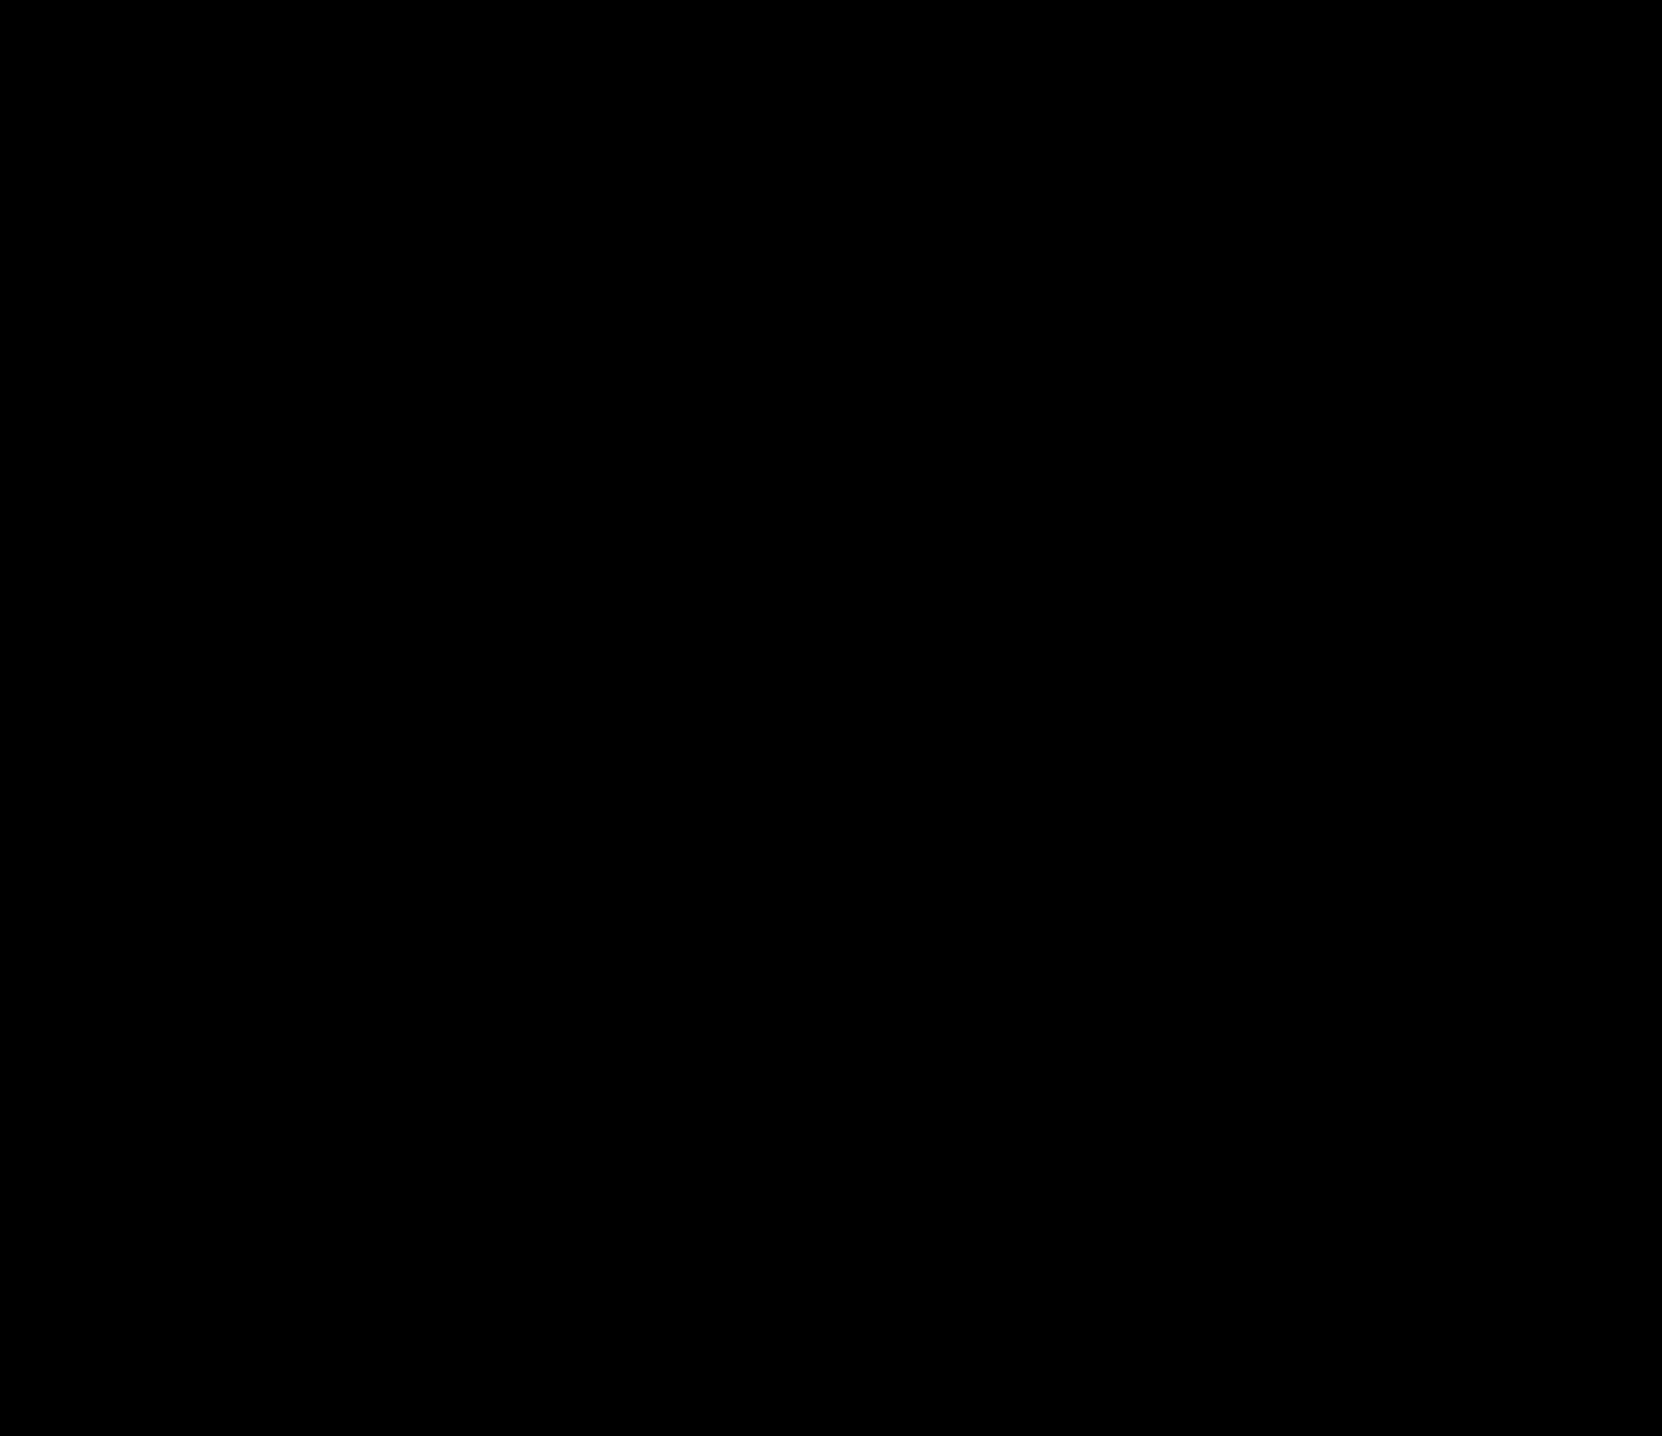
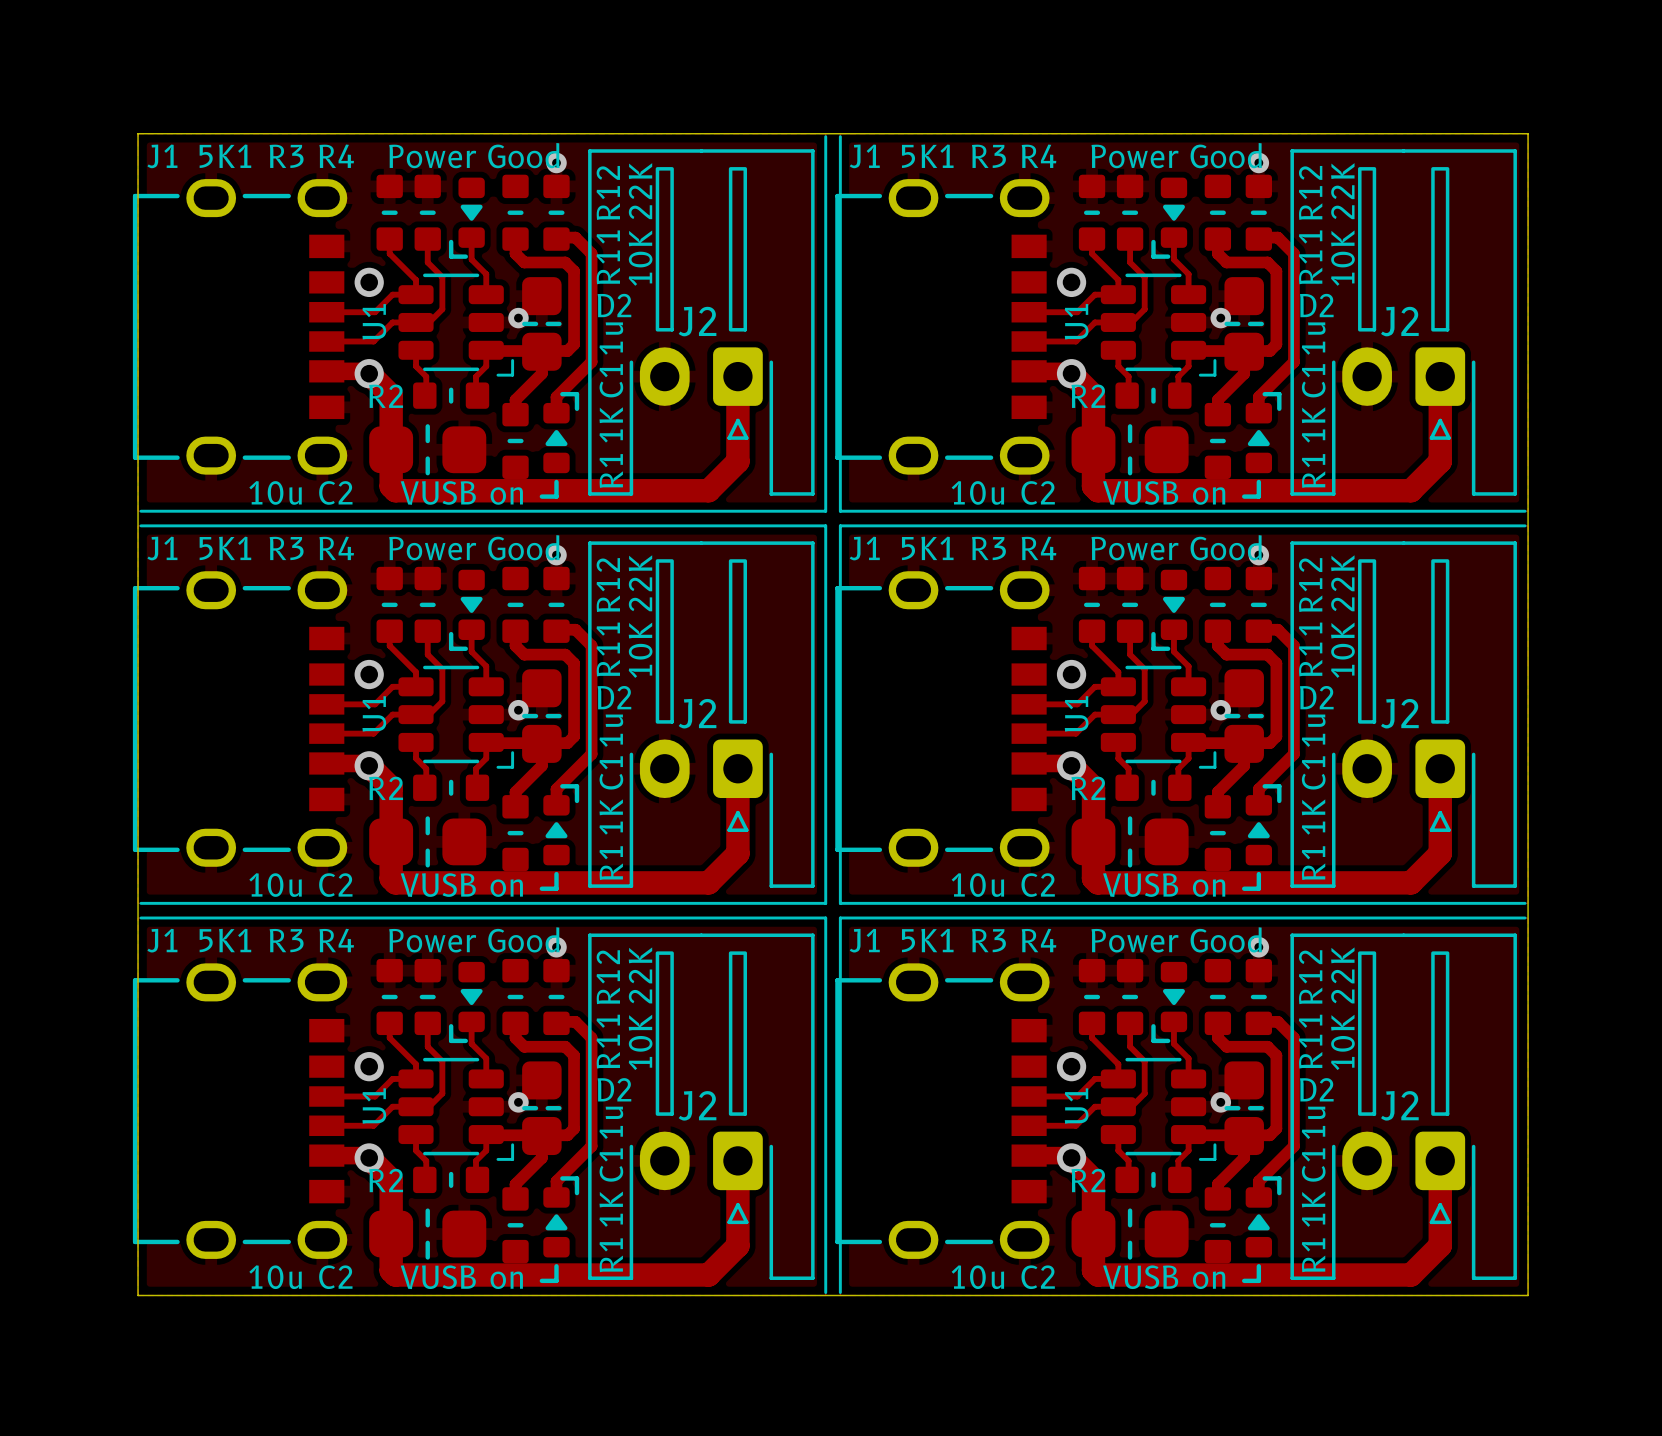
board edge: none -> (138, 133) (138, 1295) (1528, 1295) (1528, 133) (138, 133)
line: none -> (825, 136) (825, 511) (140, 511)
line: none -> (840, 136) (840, 511) (1525, 511)
via: none -> (556, 162)
via: none -> (1258, 162)
R3: none -> 5K1 (389, 212)
R4: none -> (427, 212)
R11: none -> 10K (515, 212)
R12: none -> 22K (556, 212)
R3: none -> 5K1 (1092, 212)
R4: none -> (1130, 212)
R11: none -> 10K (1217, 212)
R12: none -> 22K (1258, 212)
D2: none -> Power Good (466, 218)
D2: none -> Power Good (1169, 218)
track: none -> (389, 237) (389, 253) (416, 280) (416, 294) (392, 294) (375, 312) (326, 312)
track: none -> (427, 237) (427, 262) (442, 277) (442, 309) (429, 322) (392, 322) (373, 341) (326, 341)
track: none -> (471, 237) (471, 259) (486, 274) (486, 294)
track: none -> (515, 237) (515, 253) (524, 262) (565, 262) (574, 271) (574, 344) (567, 351) (486, 350) (486, 366) (476, 376) (476, 395)
track: none -> (556, 237) (575, 237) (591, 253) (591, 361) (556, 397) (556, 413)
track: none -> (1092, 237) (1092, 253) (1118, 280) (1118, 294) (1094, 294) (1077, 312) (1029, 312)
track: none -> (1130, 237) (1130, 262) (1144, 277) (1144, 309) (1131, 322) (1094, 322) (1075, 341) (1029, 341)
track: none -> (1173, 237) (1173, 259) (1188, 274) (1188, 294)
track: none -> (1217, 237) (1217, 253) (1226, 262) (1267, 262) (1276, 271) (1276, 344) (1269, 351) (1188, 350) (1188, 366) (1178, 376) (1178, 395)
track: none -> (1258, 237) (1277, 237) (1293, 253) (1293, 361) (1258, 397) (1258, 413)
via: none -> (369, 282)
via: none -> (1071, 282)
via: none -> (518, 318)
via: none -> (1220, 318)
J2: none -> (701, 322)
J2: none -> (1403, 322)
C1: none -> 1u (541, 323)
C1: none -> 1u (1244, 323)
U1: none -> (456, 325)
U1: none -> (1158, 325)
J1: none -> (240, 326)
J1: none -> (942, 326)
track: none -> (416, 350) (416, 366) (426, 376) (426, 395)
track: none -> (1118, 350) (1118, 366) (1128, 376) (1128, 395)
track: none -> (541, 351) (541, 373) (515, 400) (515, 416)
track: none -> (1244, 351) (1244, 373) (1217, 400) (1217, 416)
track: none -> (326, 371) (366, 371) (391, 395) (391, 486) (395, 490) (708, 490) (737, 461) (737, 376)
track: none -> (1029, 371) (1069, 371) (1093, 395) (1093, 486) (1097, 490) (1411, 490) (1440, 461) (1440, 376)
via: none -> (369, 373)
via: none -> (1071, 373)
R2: none -> (451, 395)
R2: none -> (1153, 395)
part: none -> VUSB on (561, 432)
part: none -> VUSB on (1263, 432)
R1: none -> 1K (515, 440)
R1: none -> 1K (1217, 440)
C2: none -> 10u (427, 449)
C2: none -> 10u (1130, 449)
line: none -> (556, 481) (556, 496) (541, 496)
line: none -> (1258, 481) (1258, 496) (1244, 496)
line: none -> (140, 525) (825, 525) (825, 903) (140, 903)
line: none -> (1525, 525) (840, 525) (840, 903) (1525, 903)
via: none -> (556, 555)
via: none -> (1258, 555)
R3: none -> 5K1 (389, 604)
R4: none -> (427, 604)
R11: none -> 10K (515, 604)
R12: none -> 22K (556, 604)
R3: none -> 5K1 (1092, 604)
R4: none -> (1130, 604)
R11: none -> 10K (1217, 604)
R12: none -> 22K (1258, 604)
D2: none -> Power Good (466, 610)
D2: none -> Power Good (1169, 610)
track: none -> (389, 629) (389, 645) (416, 672) (416, 686) (392, 686) (375, 704) (326, 704)
track: none -> (427, 629) (427, 654) (442, 669) (442, 701) (429, 714) (392, 714) (373, 733) (326, 733)
track: none -> (471, 629) (471, 651) (486, 666) (486, 686)
track: none -> (515, 629) (515, 645) (524, 654) (565, 654) (574, 663) (574, 736) (567, 743) (486, 742) (486, 758) (476, 768) (476, 787)
track: none -> (556, 629) (575, 629) (591, 645) (591, 754) (556, 789) (556, 805)
track: none -> (1092, 629) (1092, 645) (1118, 672) (1118, 686) (1094, 686) (1077, 704) (1029, 704)
track: none -> (1130, 629) (1130, 654) (1144, 669) (1144, 701) (1131, 714) (1094, 714) (1075, 733) (1029, 733)
track: none -> (1173, 629) (1173, 651) (1188, 666) (1188, 686)
track: none -> (1217, 629) (1217, 645) (1226, 654) (1267, 654) (1276, 663) (1276, 736) (1269, 743) (1188, 742) (1188, 758) (1178, 768) (1178, 787)
track: none -> (1258, 629) (1277, 629) (1293, 645) (1293, 754) (1258, 789) (1258, 805)
via: none -> (369, 674)
via: none -> (1071, 674)
via: none -> (518, 710)
via: none -> (1220, 710)
J2: none -> (701, 714)
J2: none -> (1403, 714)
C1: none -> 1u (541, 716)
C1: none -> 1u (1244, 716)
U1: none -> (456, 717)
U1: none -> (1158, 717)
J1: none -> (240, 719)
J1: none -> (942, 719)
track: none -> (416, 742) (416, 758) (426, 768) (426, 787)
track: none -> (1118, 742) (1118, 758) (1128, 768) (1128, 787)
track: none -> (541, 743) (541, 765) (515, 792) (515, 808)
track: none -> (1244, 743) (1244, 765) (1217, 792) (1217, 808)
track: none -> (326, 763) (366, 763) (391, 787) (391, 878) (395, 882) (708, 882) (737, 853) (737, 768)
track: none -> (1029, 763) (1069, 763) (1093, 787) (1093, 878) (1097, 882) (1411, 882) (1440, 853) (1440, 768)
via: none -> (369, 765)
via: none -> (1071, 765)
R2: none -> (451, 787)
R2: none -> (1153, 787)
part: none -> VUSB on (561, 824)
part: none -> VUSB on (1263, 824)
R1: none -> 1K (515, 833)
R1: none -> 1K (1217, 833)
C2: none -> 10u (427, 841)
C2: none -> 10u (1130, 841)
line: none -> (556, 874) (556, 888) (541, 888)
line: none -> (1258, 874) (1258, 888) (1244, 888)
line: none -> (140, 917) (825, 917) (825, 1292)
line: none -> (1525, 917) (840, 917) (840, 1292)
via: none -> (556, 947)
via: none -> (1258, 947)
R3: none -> 5K1 (389, 997)
R4: none -> (427, 997)
R11: none -> 10K (515, 997)
R12: none -> 22K (556, 997)
R3: none -> 5K1 (1092, 997)
R4: none -> (1130, 997)
R11: none -> 10K (1217, 997)
R12: none -> 22K (1258, 997)
D2: none -> Power Good (466, 1002)
D2: none -> Power Good (1169, 1002)
track: none -> (389, 1021) (389, 1037) (416, 1064) (416, 1078) (392, 1078) (375, 1096) (326, 1096)
track: none -> (427, 1021) (427, 1046) (442, 1061) (442, 1093) (429, 1106) (392, 1106) (373, 1125) (326, 1125)
track: none -> (471, 1021) (471, 1043) (486, 1058) (486, 1078)
track: none -> (515, 1021) (515, 1037) (524, 1046) (565, 1046) (574, 1055) (574, 1128) (567, 1135) (486, 1134) (486, 1150) (476, 1160) (476, 1179)
track: none -> (556, 1021) (575, 1021) (591, 1037) (591, 1146) (556, 1181) (556, 1197)
track: none -> (1092, 1021) (1092, 1037) (1118, 1064) (1118, 1078) (1094, 1078) (1077, 1096) (1029, 1096)
track: none -> (1130, 1021) (1130, 1046) (1144, 1061) (1144, 1093) (1131, 1106) (1094, 1106) (1075, 1125) (1029, 1125)
track: none -> (1173, 1021) (1173, 1043) (1188, 1058) (1188, 1078)
track: none -> (1217, 1021) (1217, 1037) (1226, 1046) (1267, 1046) (1276, 1055) (1276, 1128) (1269, 1135) (1188, 1134) (1188, 1150) (1178, 1160) (1178, 1179)
track: none -> (1258, 1021) (1277, 1021) (1293, 1037) (1293, 1146) (1258, 1181) (1258, 1197)
via: none -> (369, 1066)
via: none -> (1071, 1066)
via: none -> (518, 1102)
via: none -> (1220, 1102)
J2: none -> (701, 1106)
J2: none -> (1403, 1106)
C1: none -> 1u (541, 1108)
C1: none -> 1u (1244, 1108)
U1: none -> (456, 1109)
U1: none -> (1158, 1109)
J1: none -> (240, 1111)
J1: none -> (942, 1111)
track: none -> (416, 1134) (416, 1150) (426, 1160) (426, 1179)
track: none -> (1118, 1134) (1118, 1150) (1128, 1160) (1128, 1179)
track: none -> (541, 1135) (541, 1157) (515, 1184) (515, 1200)
track: none -> (1244, 1135) (1244, 1157) (1217, 1184) (1217, 1200)
track: none -> (326, 1155) (366, 1155) (391, 1179) (391, 1270) (395, 1275) (708, 1275) (737, 1245) (737, 1160)
track: none -> (1029, 1155) (1069, 1155) (1093, 1179) (1093, 1270) (1097, 1275) (1411, 1275) (1440, 1245) (1440, 1160)
via: none -> (369, 1157)
via: none -> (1071, 1157)
R2: none -> (451, 1179)
R2: none -> (1153, 1179)
part: none -> VUSB on (561, 1216)
part: none -> VUSB on (1263, 1216)
R1: none -> 1K (515, 1225)
R1: none -> 1K (1217, 1225)
C2: none -> 10u (427, 1234)
C2: none -> 10u (1130, 1234)
line: none -> (556, 1266) (556, 1280) (541, 1280)
line: none -> (1258, 1266) (1258, 1280) (1244, 1280)

